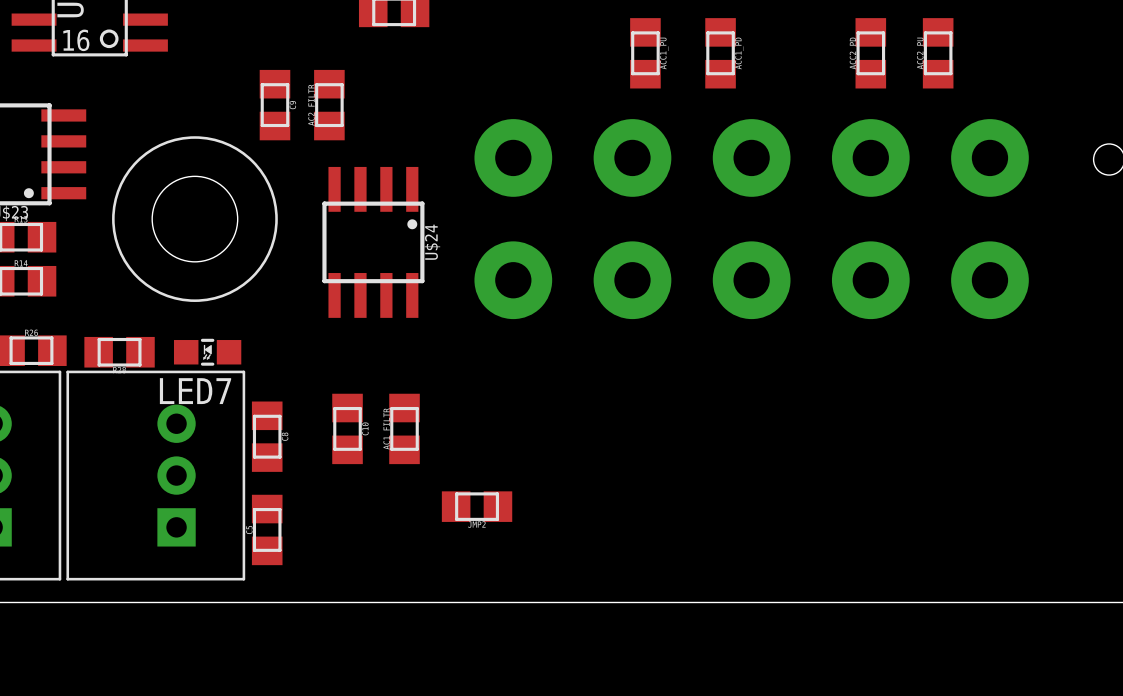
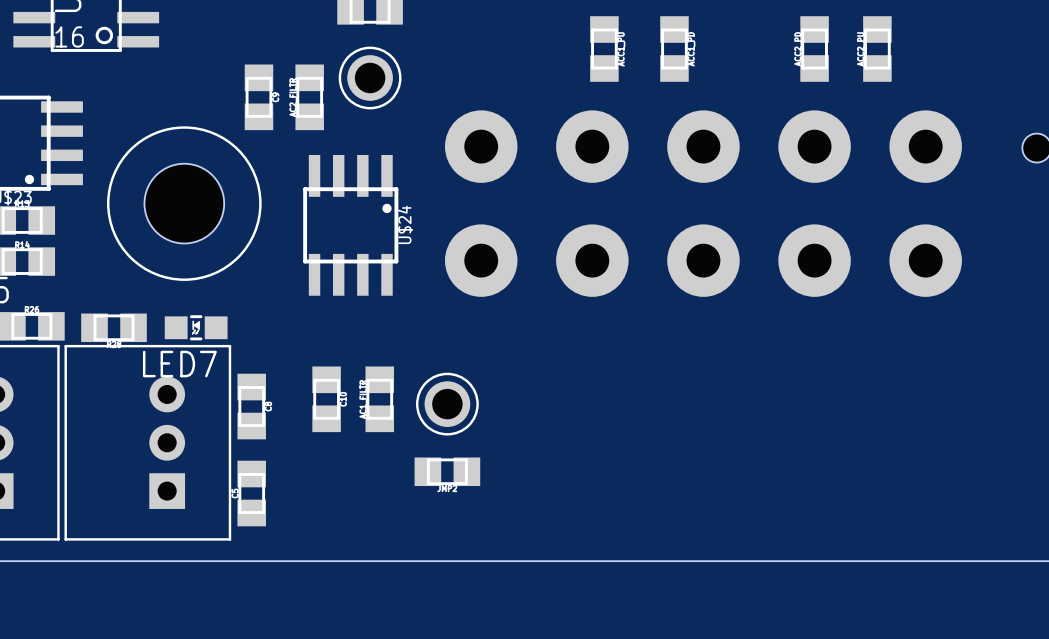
part: none -> (370, 78)
part: none -> (447, 404)

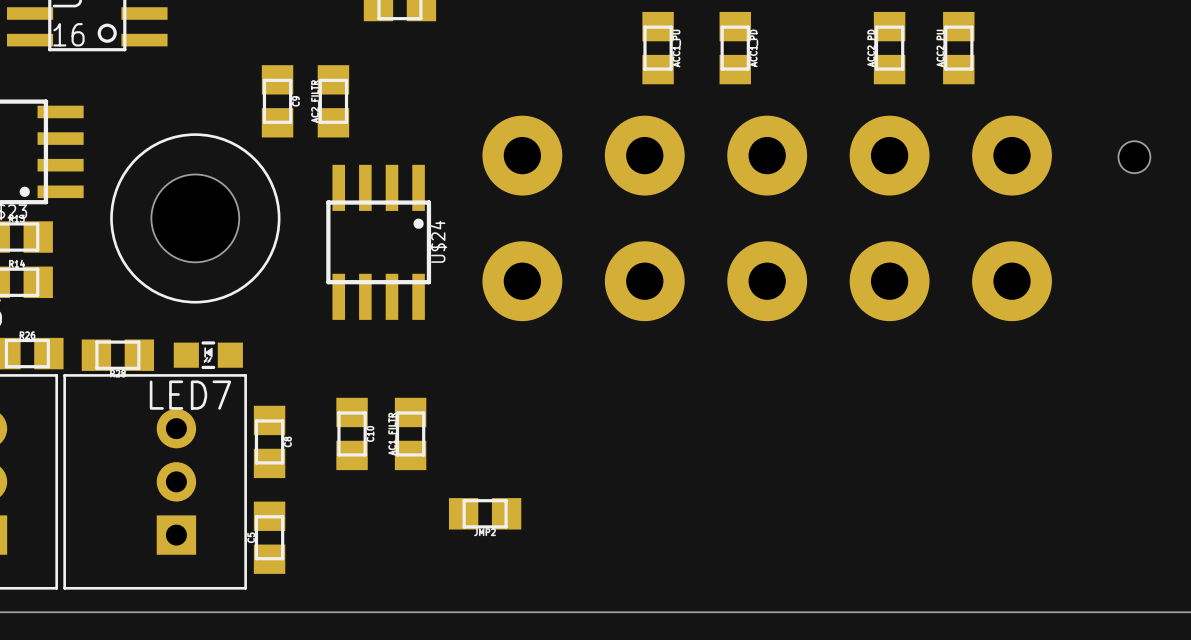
part: (370, 78) -> none
part: (447, 404) -> none

